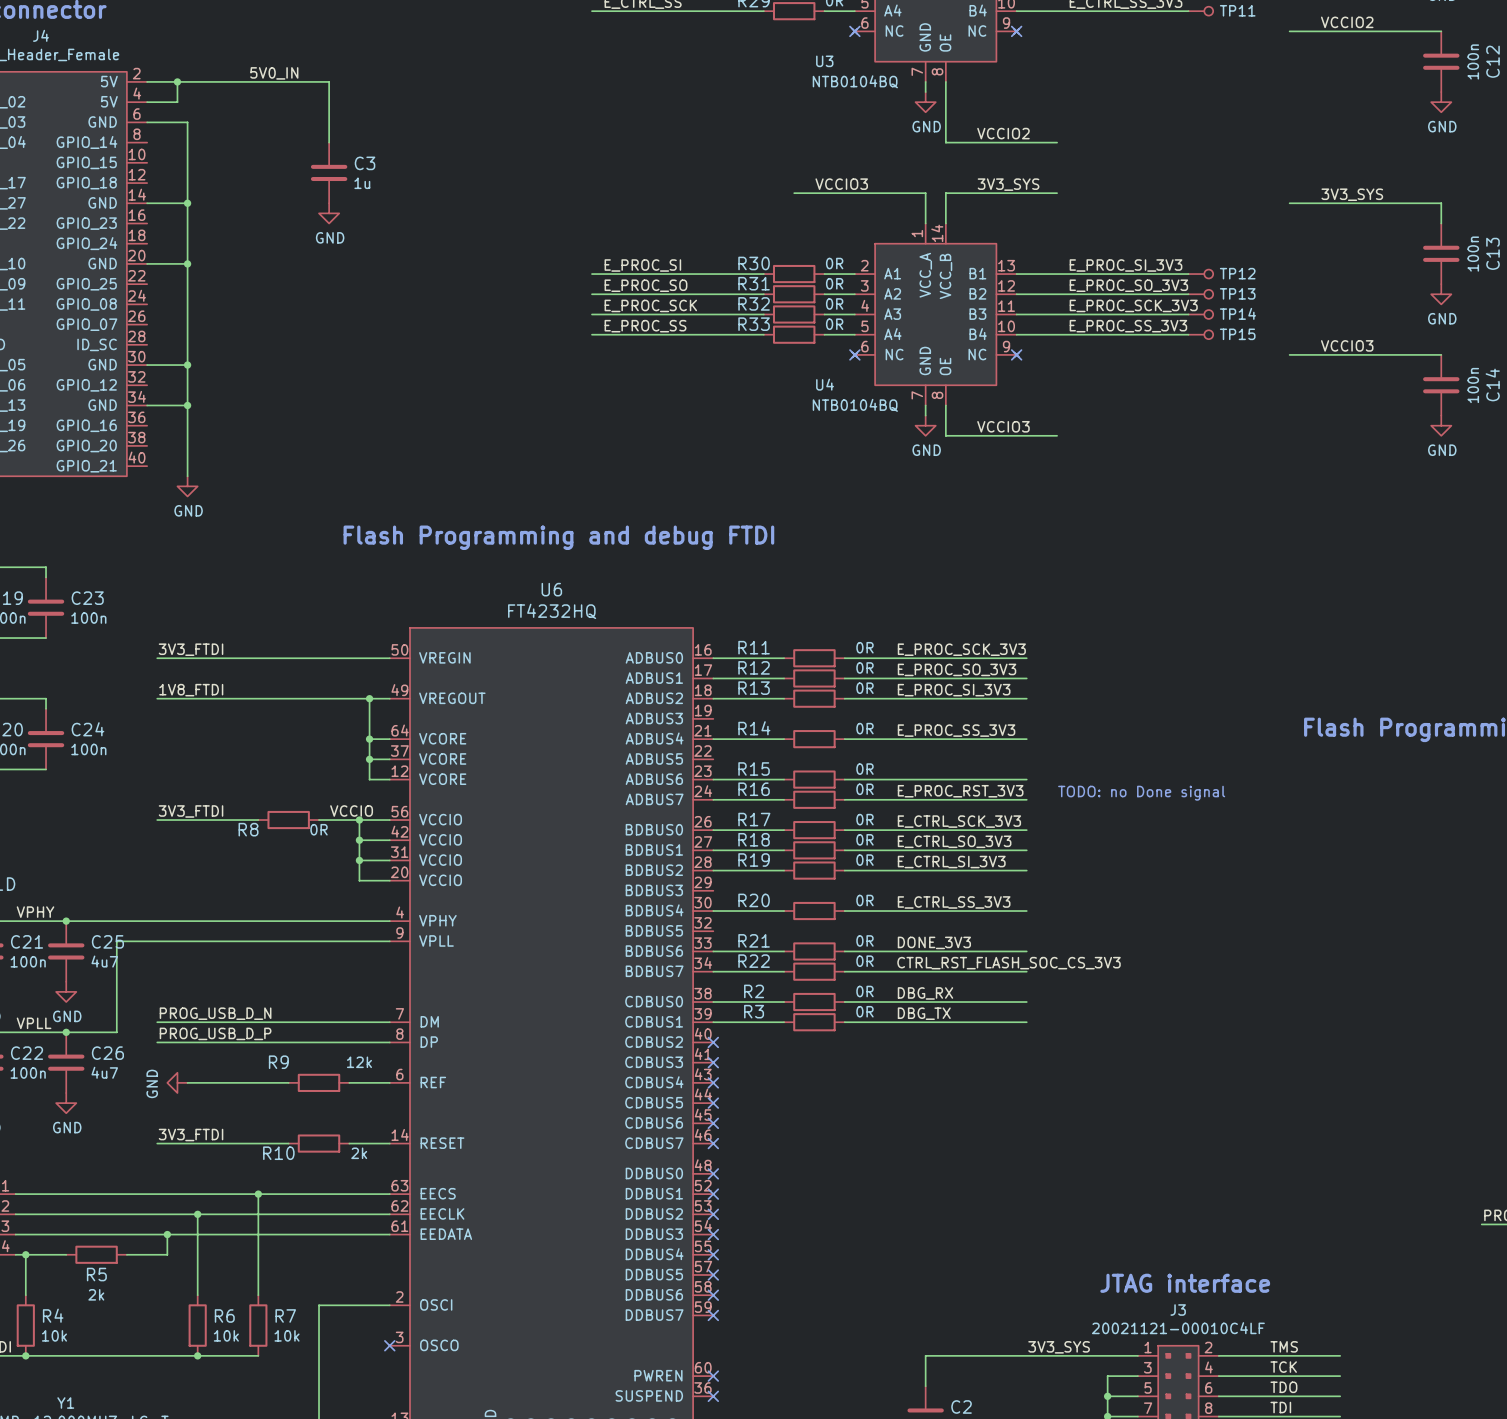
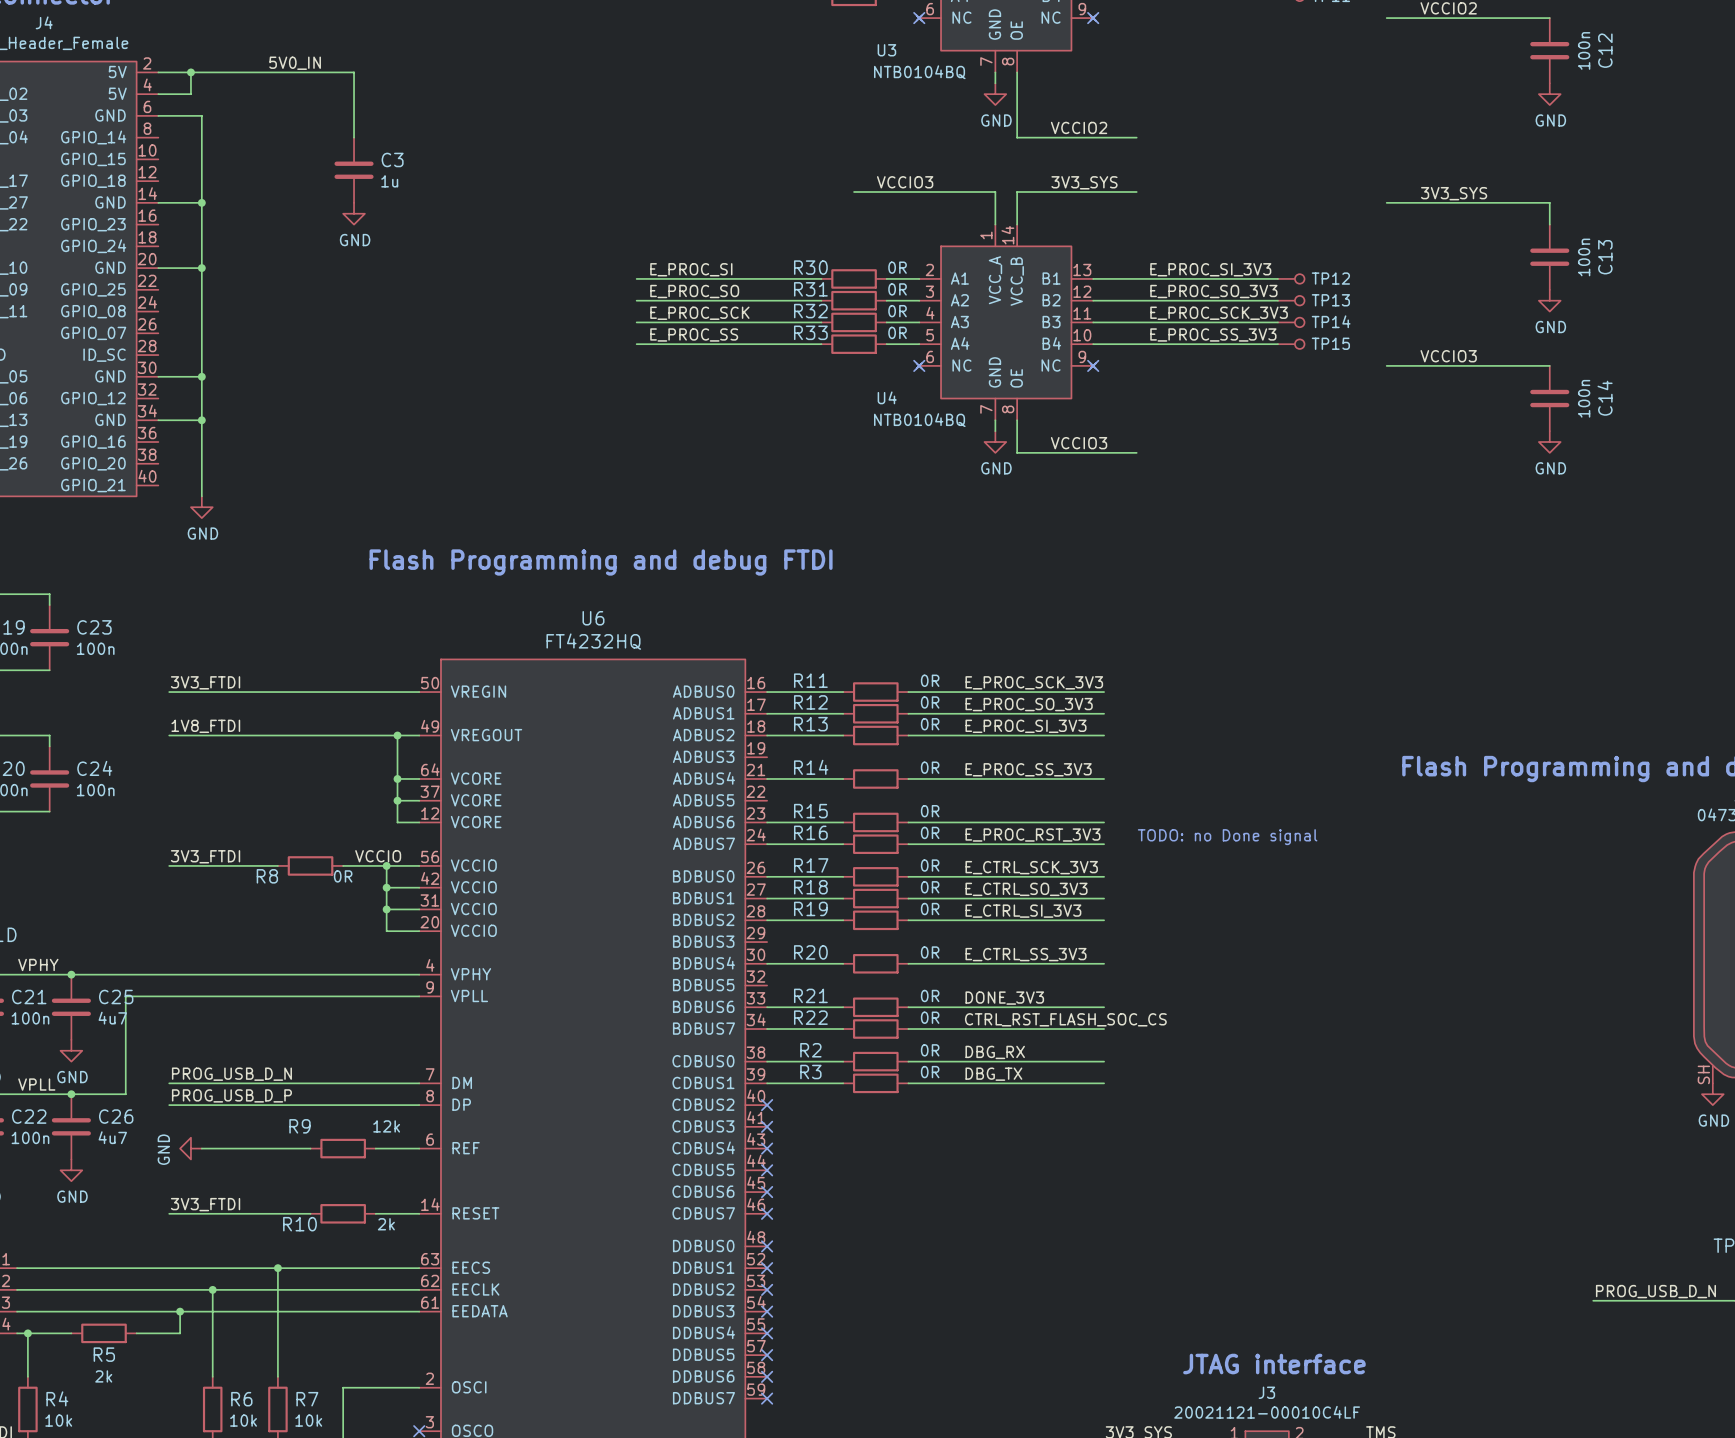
label: CTRL_RST_FLASH_SOC_CS_3V3 (1009, 963) -> CTRL_RST_FLASH_SOC_CS (1065, 1019)

